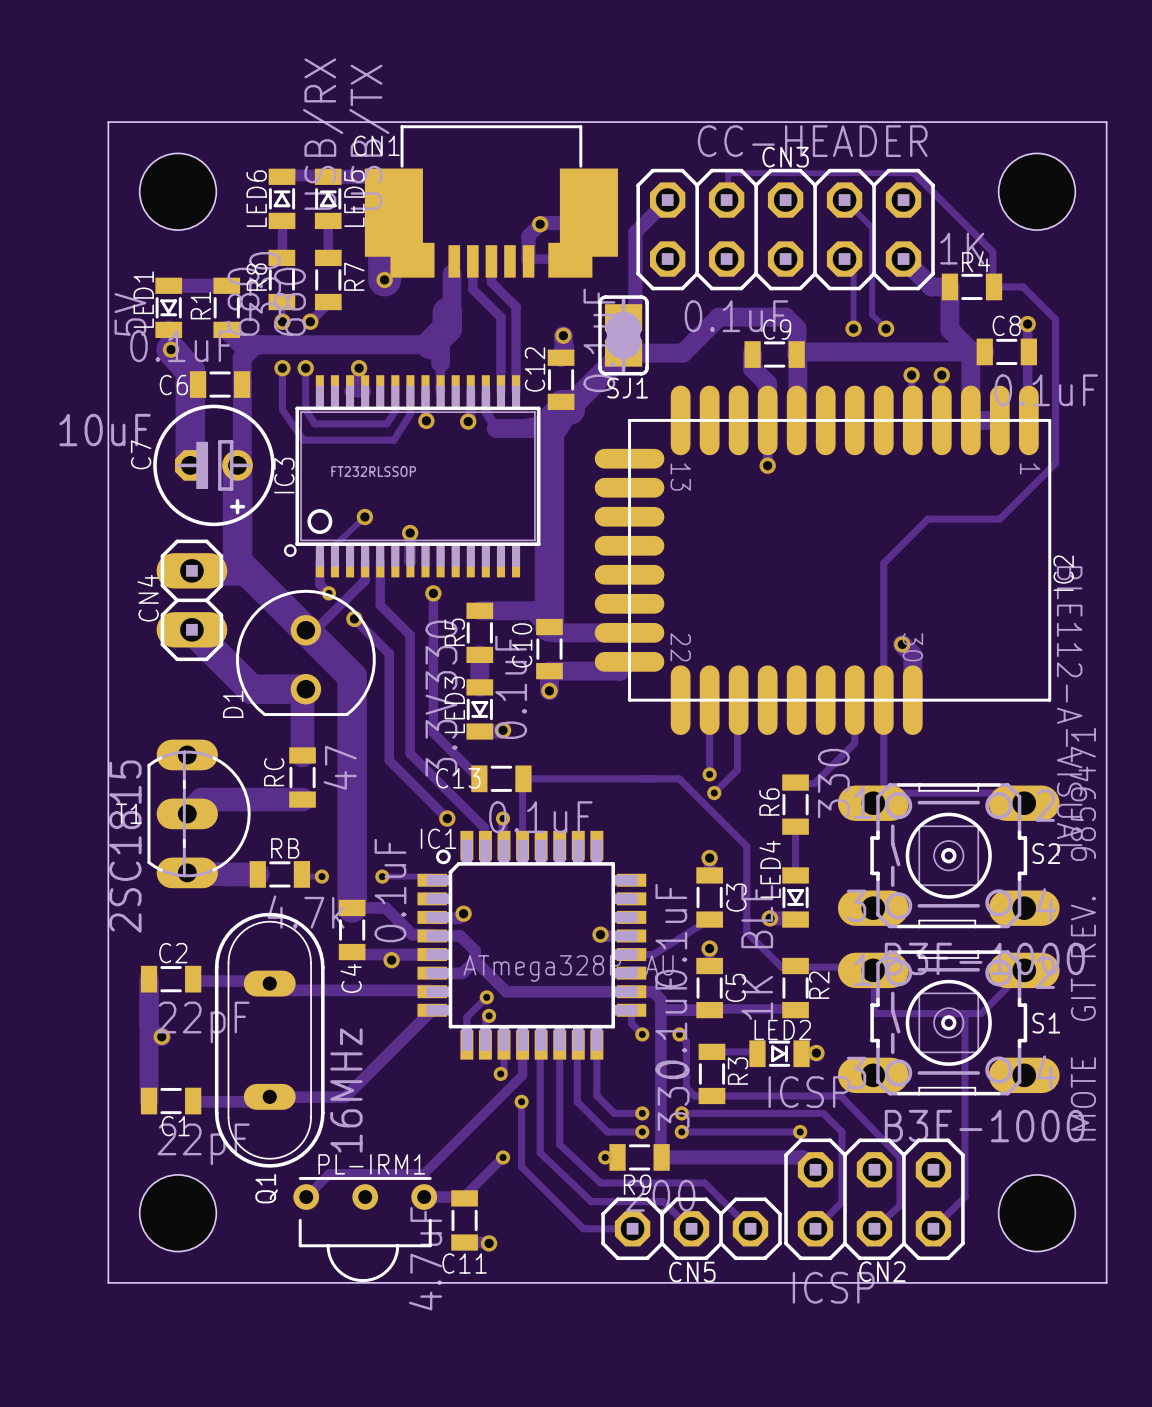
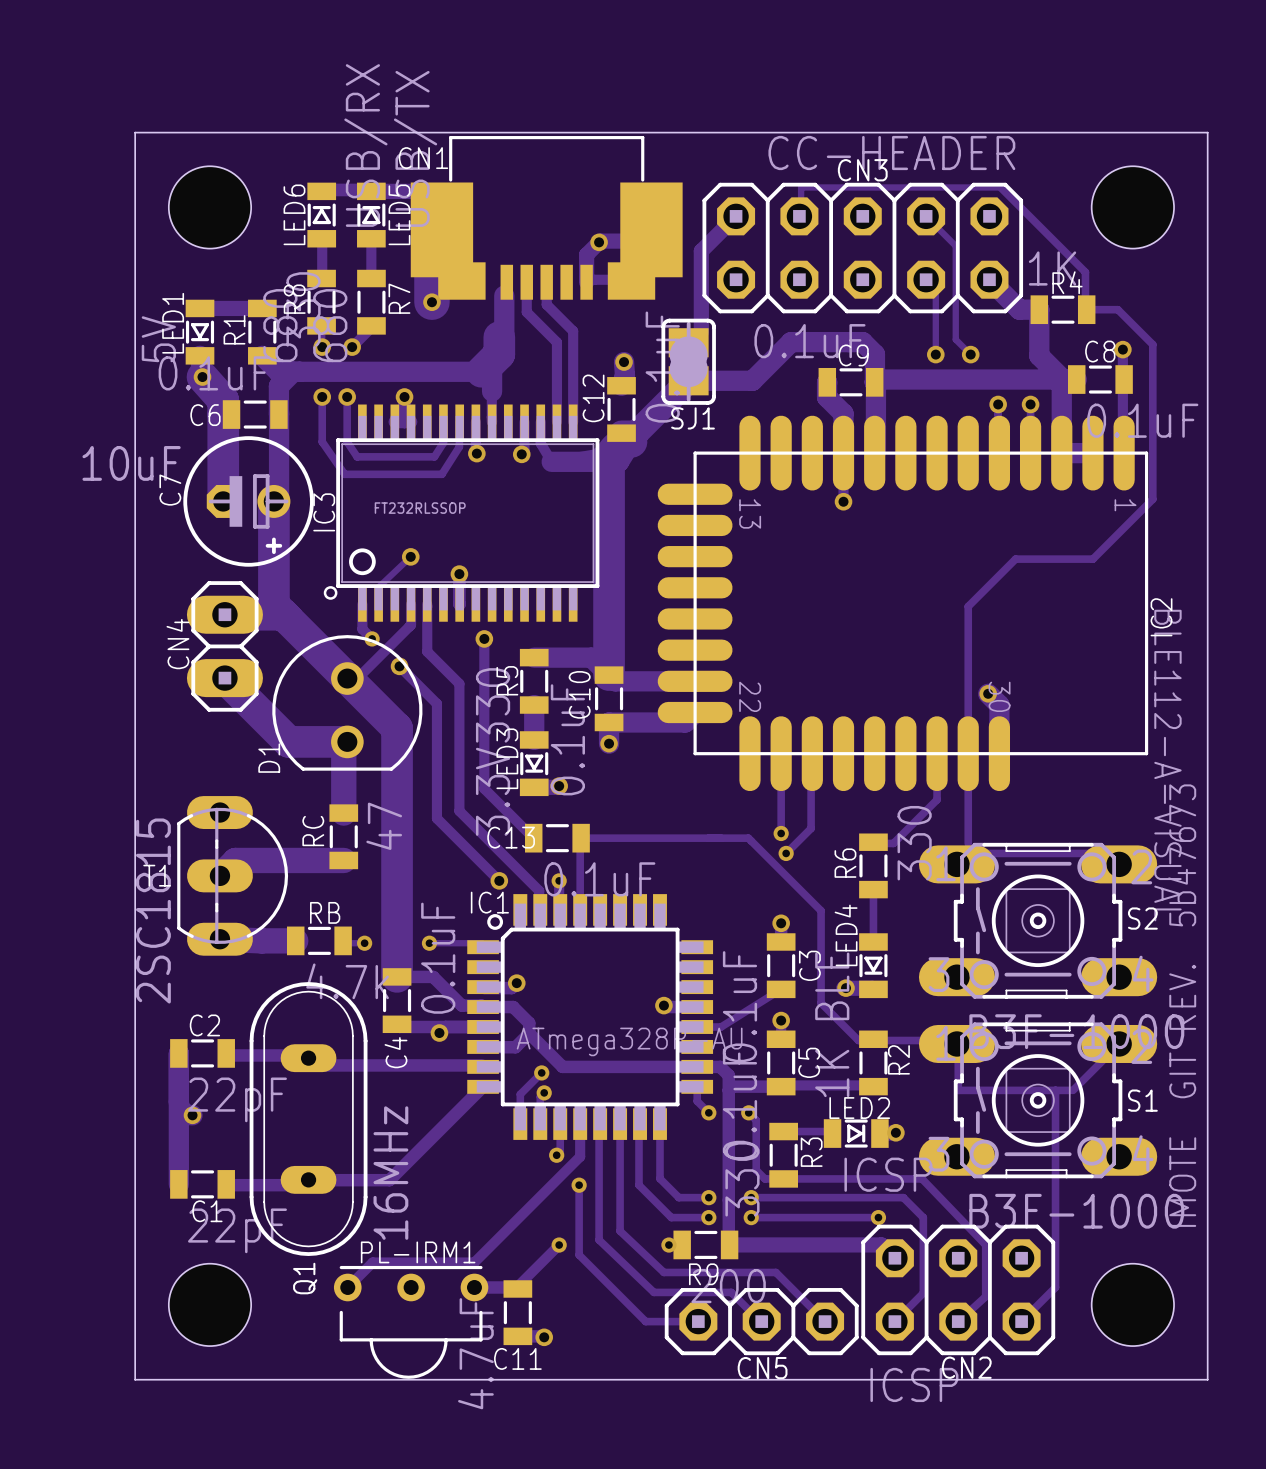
drawing shape: [1069, 727, 1096, 1021] -> [1168, 784, 1197, 1099]

